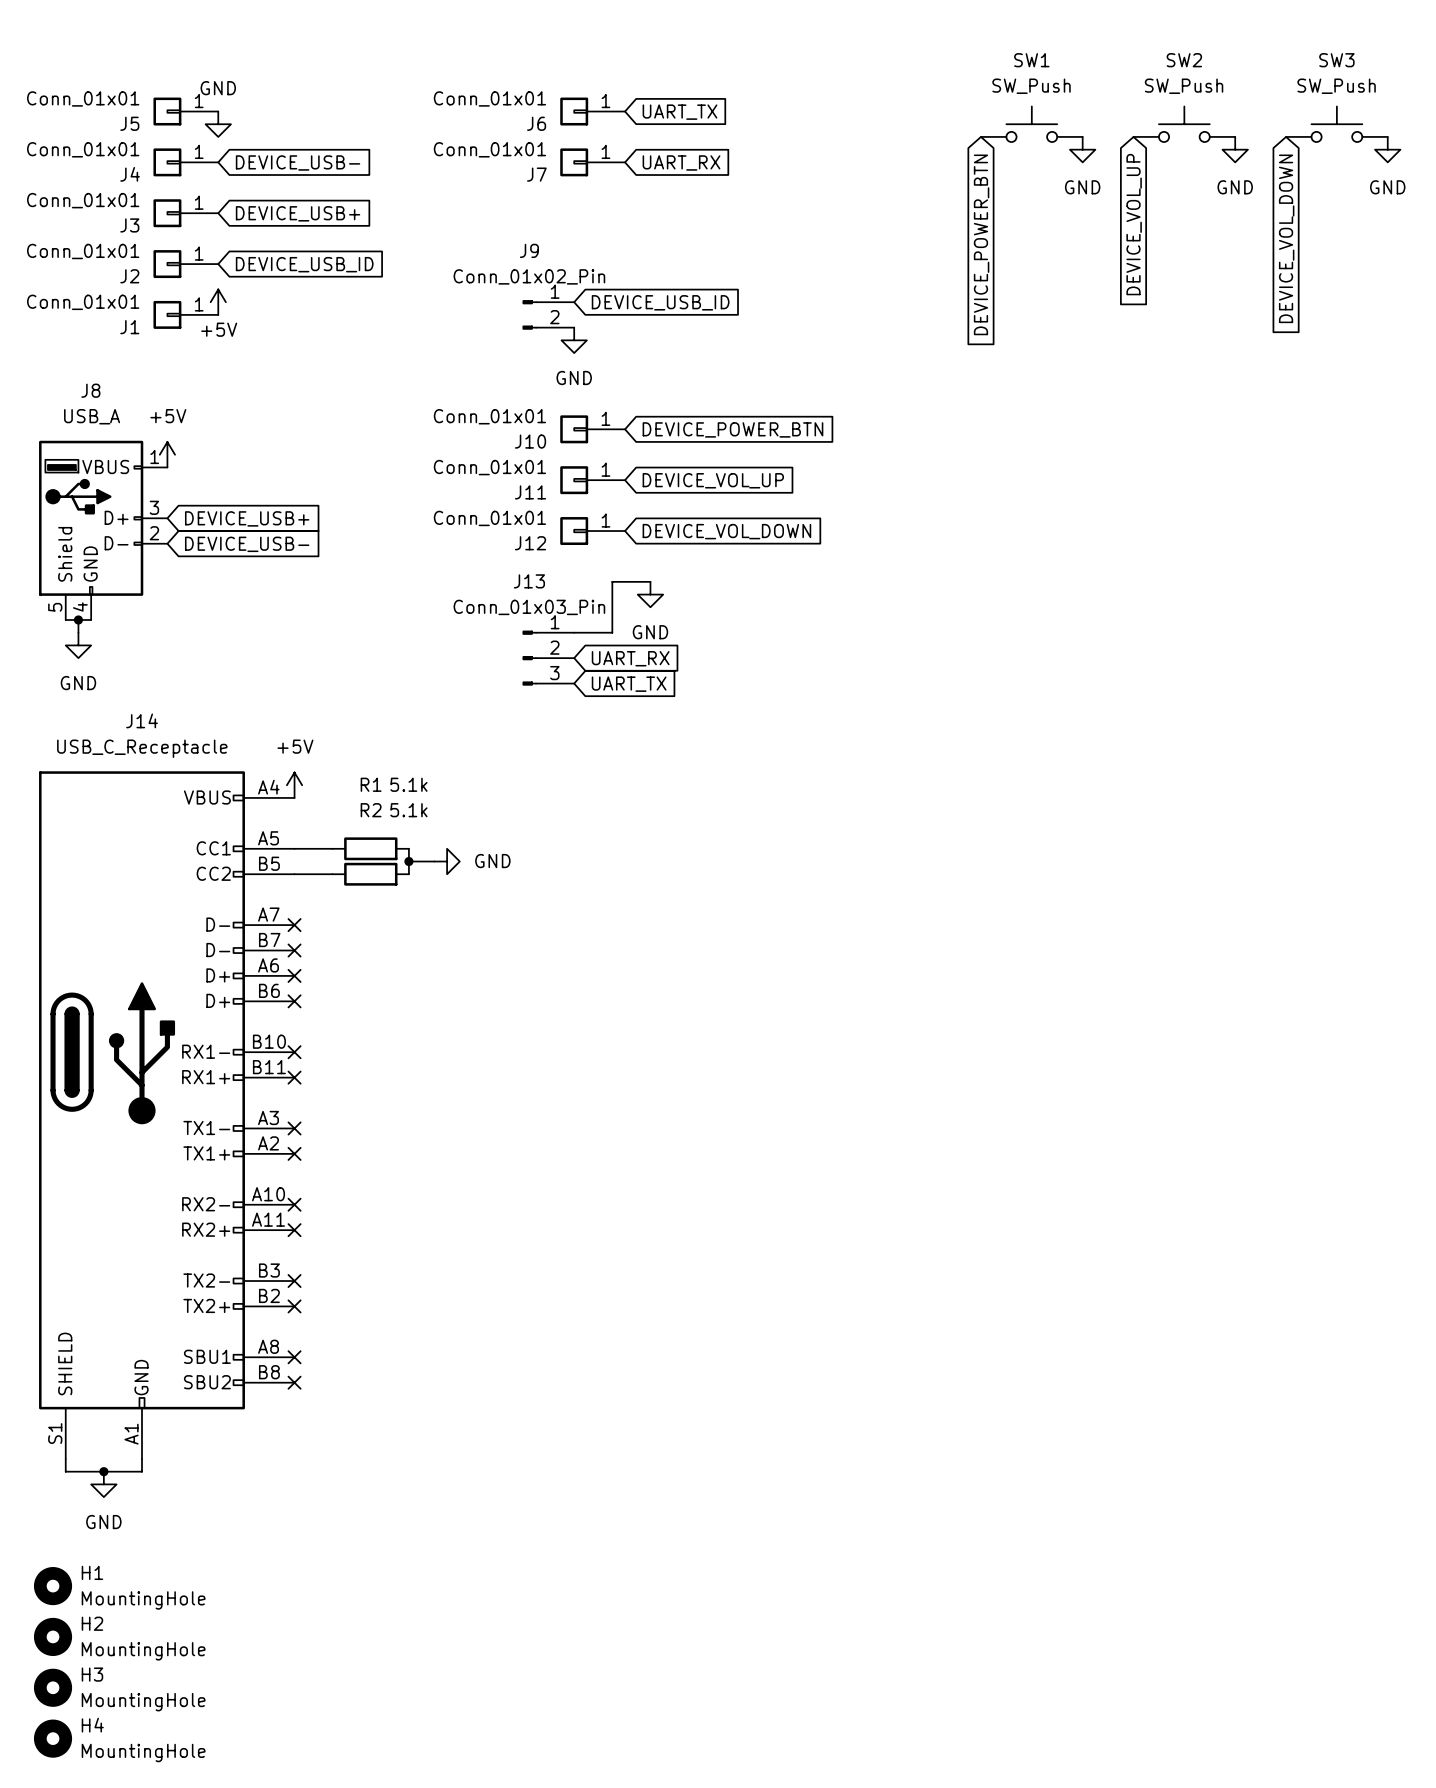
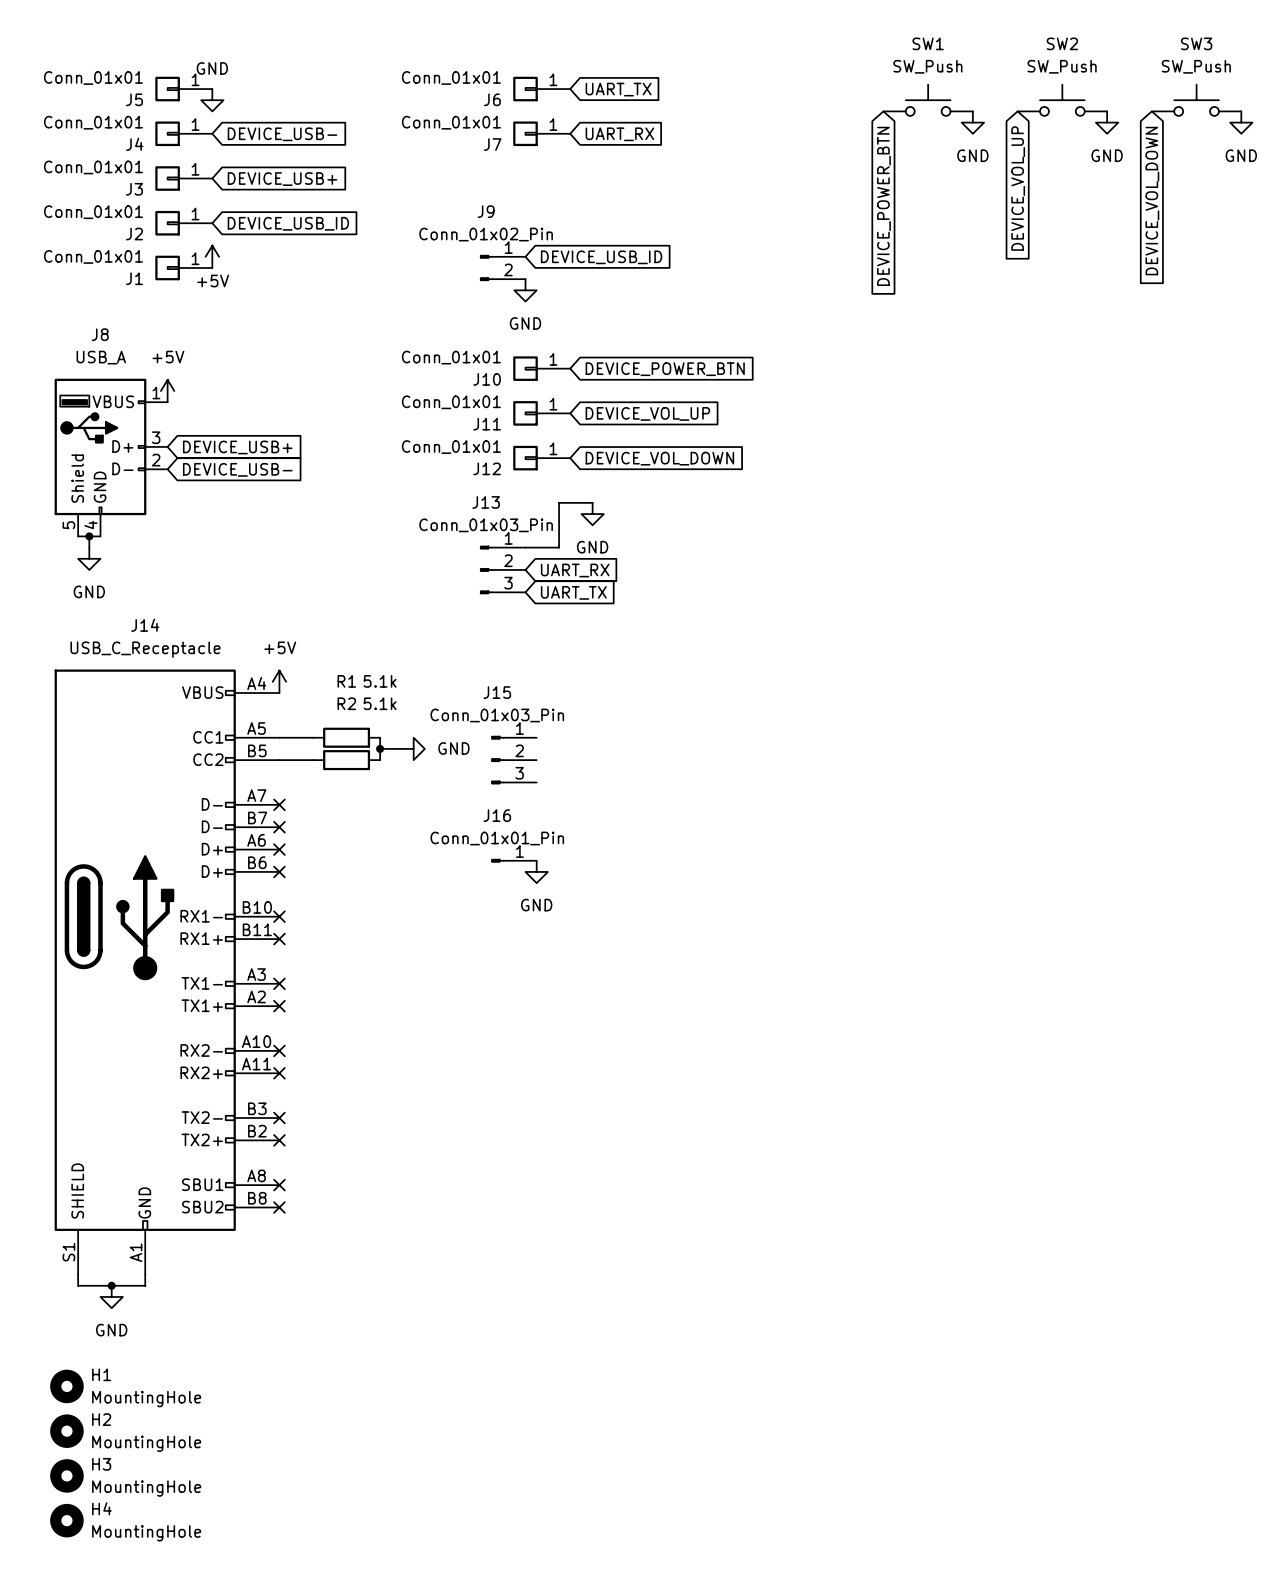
J15: none -> Conn_01x03_Pin (513, 760)
J16: none -> Conn_01x01_Pin (513, 860)
power symbol: none -> GND (536, 871)

